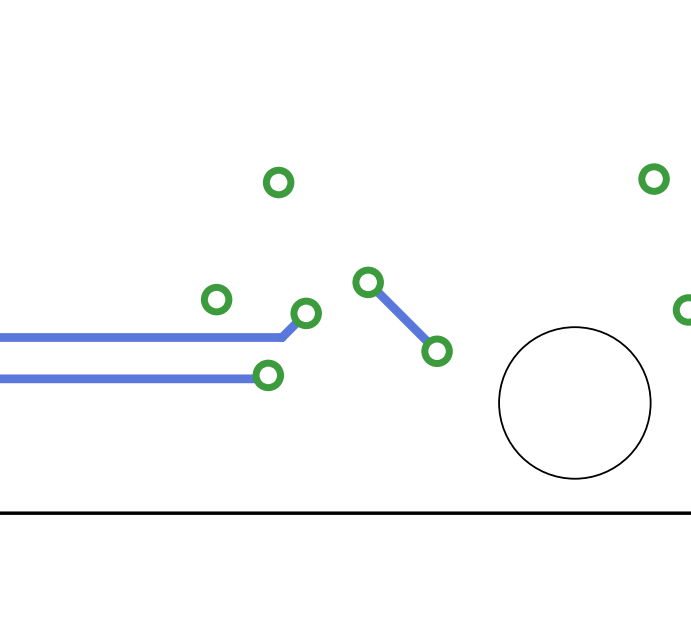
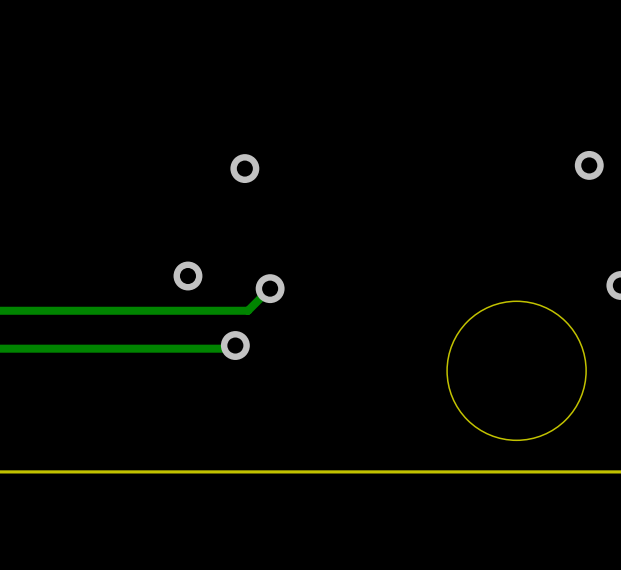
track: (368, 282) (437, 351) -> none
via: (368, 282) -> none
via: (437, 351) -> none

